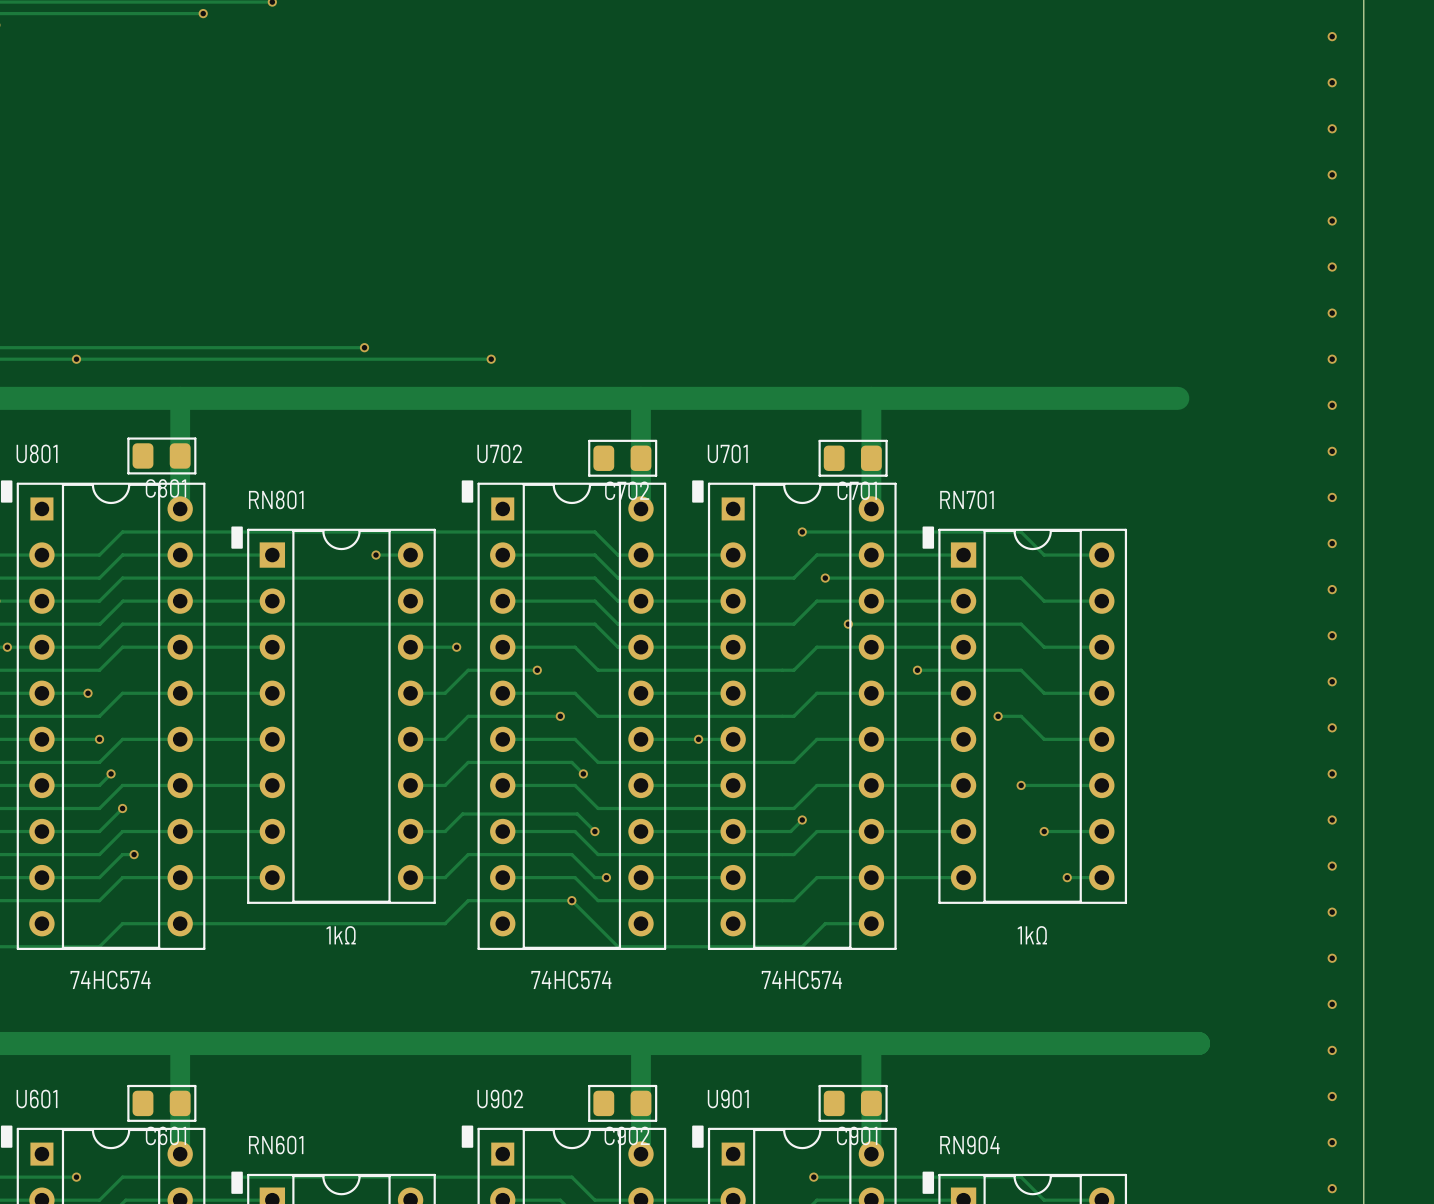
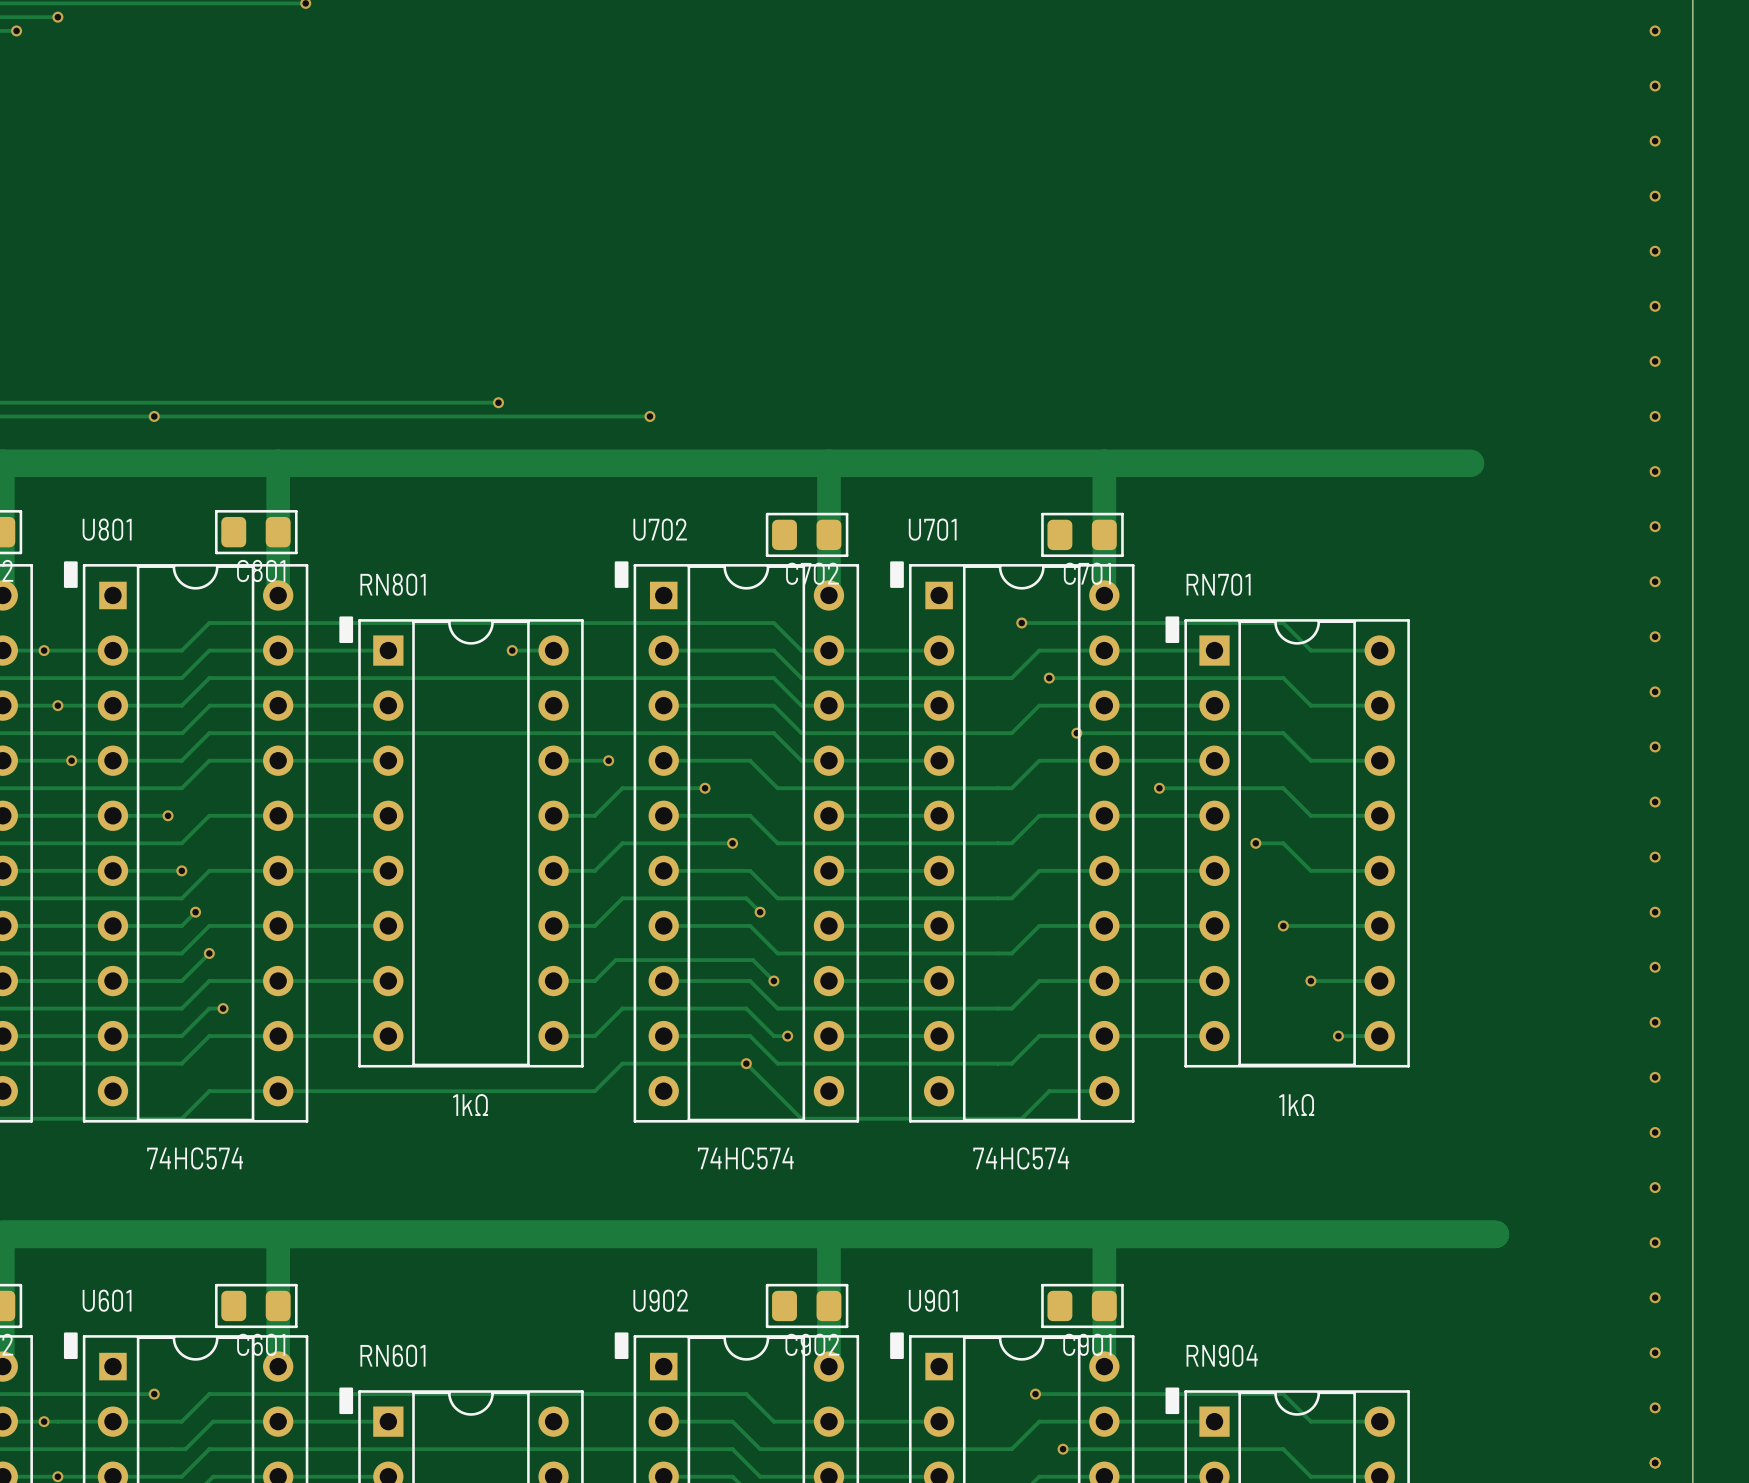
via: (698, 739) -> none
track: (802, 820) (790, 831) (736, 831) -> none
via: (802, 820) -> none

